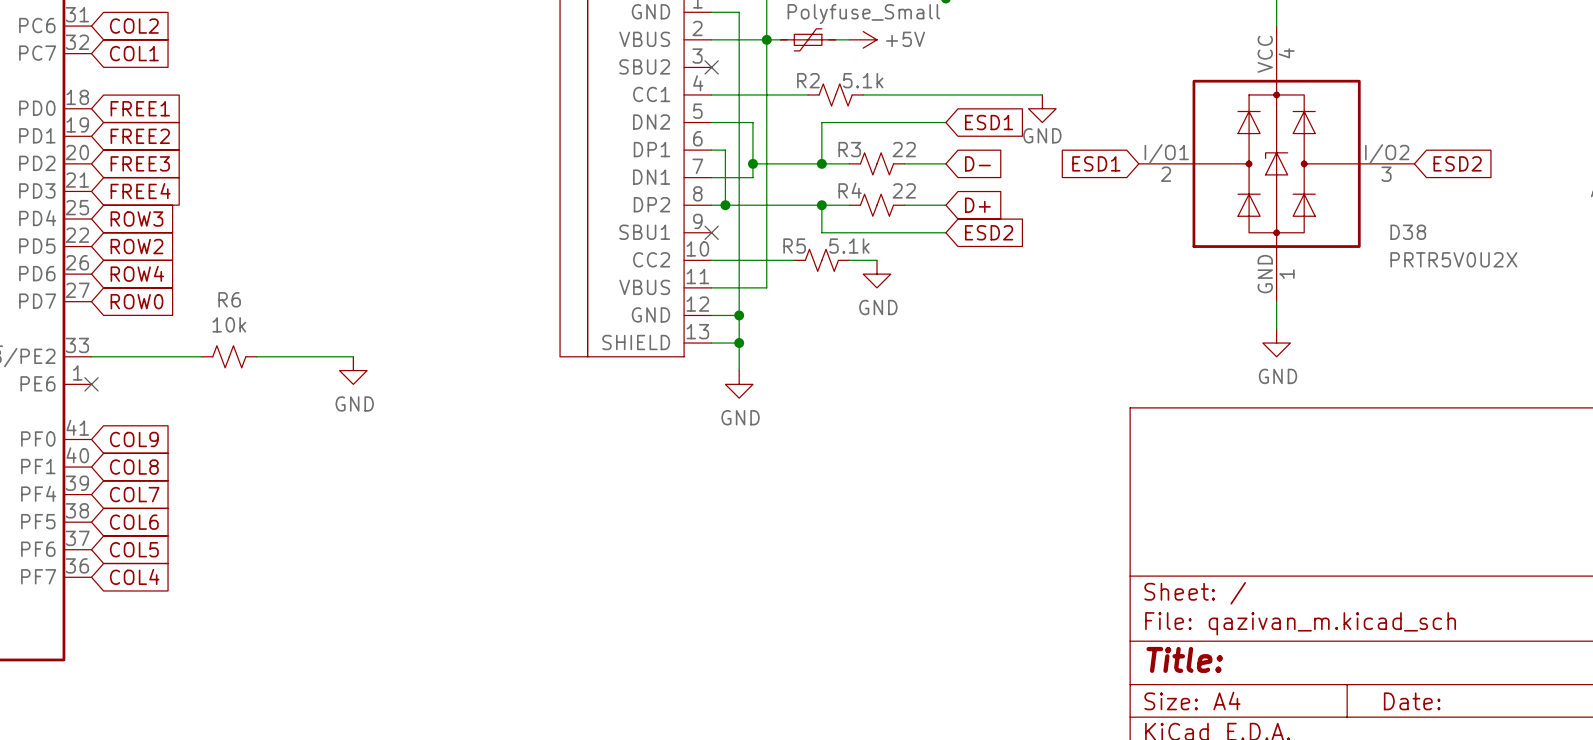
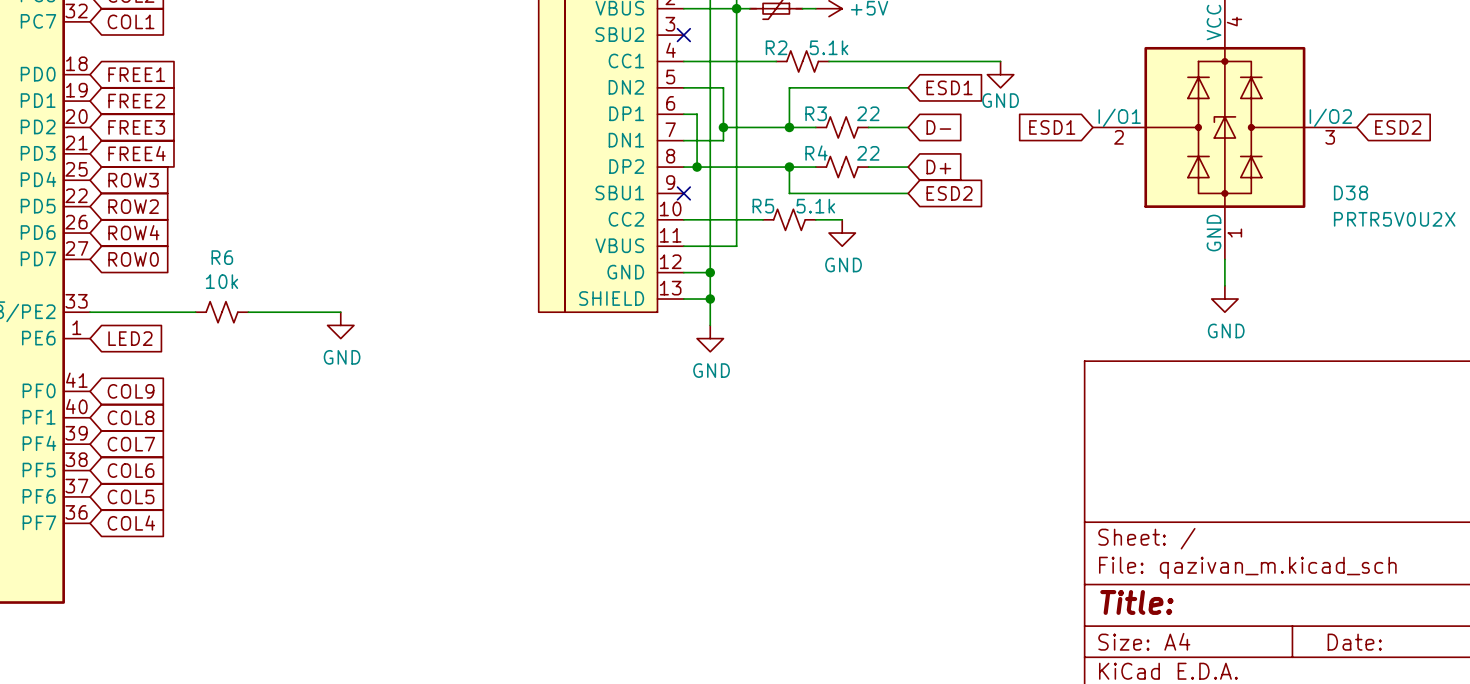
no-connect mark: (91, 384) -> none
global label: none -> LED2 (130, 338)

